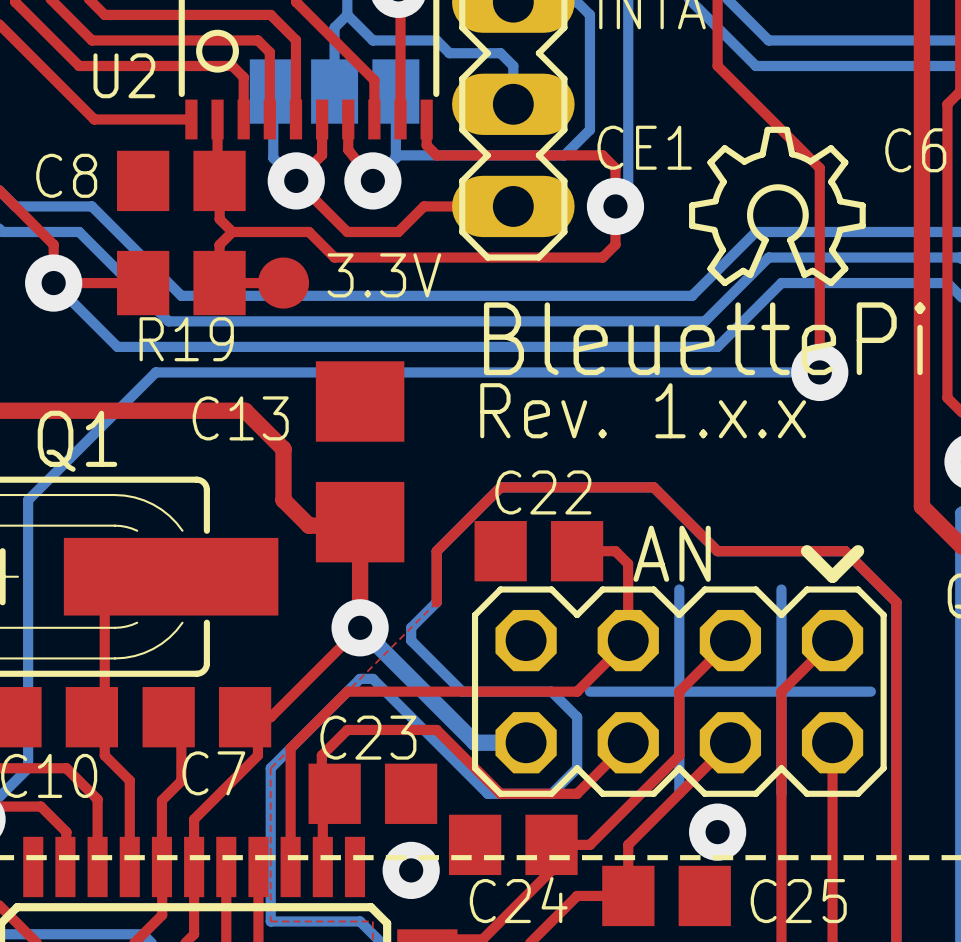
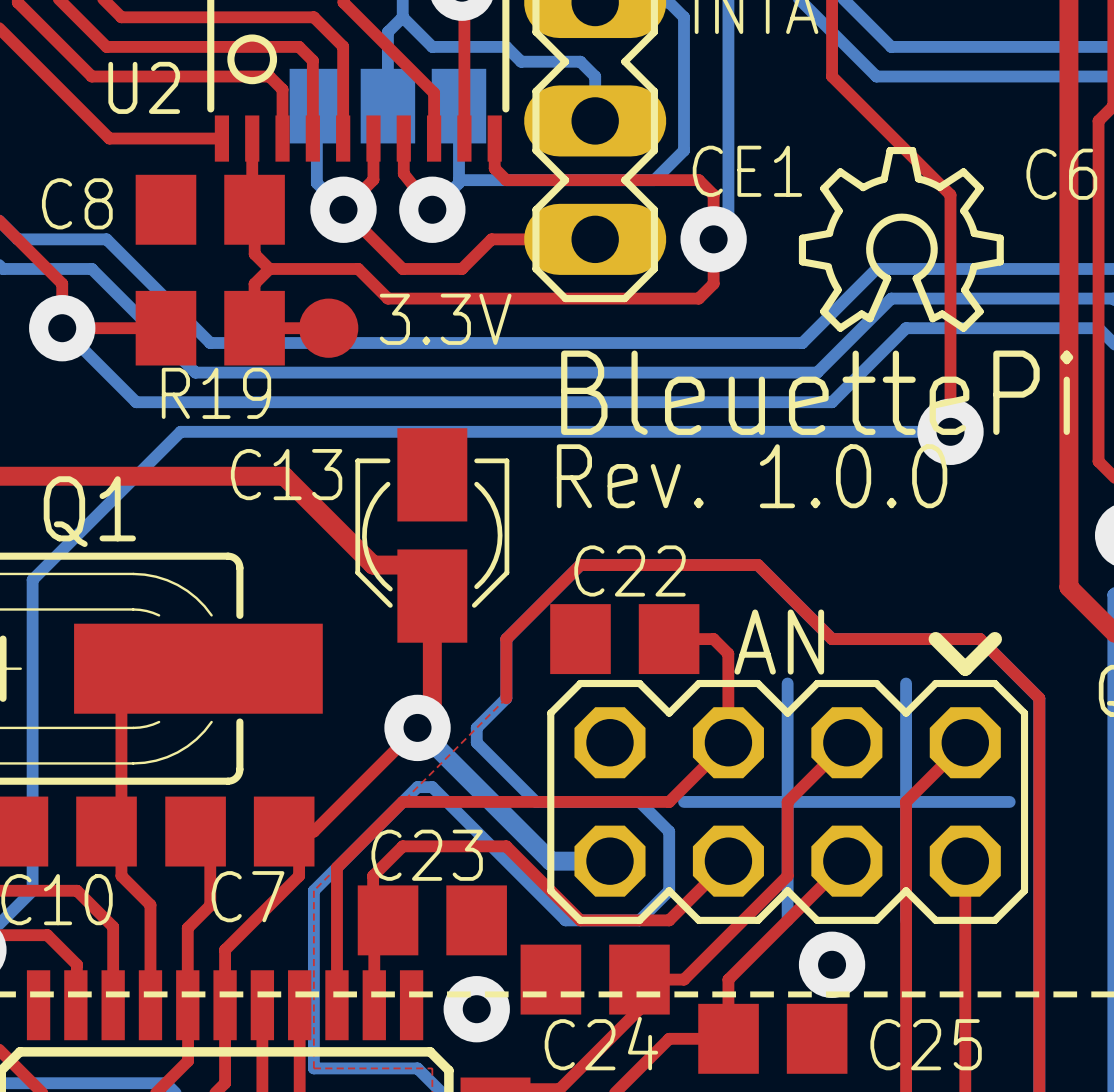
C13 footprint: [315, 361, 405, 563] -> [355, 428, 510, 643]
text: Rev. 1.x.x (643, 410) -> Rev. 1.0.0 (752, 476)
top track: (283, 449) (283, 500) (309, 525) (356, 525) (360, 522) (360, 627) -> (328, 520) (373, 565) (430, 565) (432, 713)

